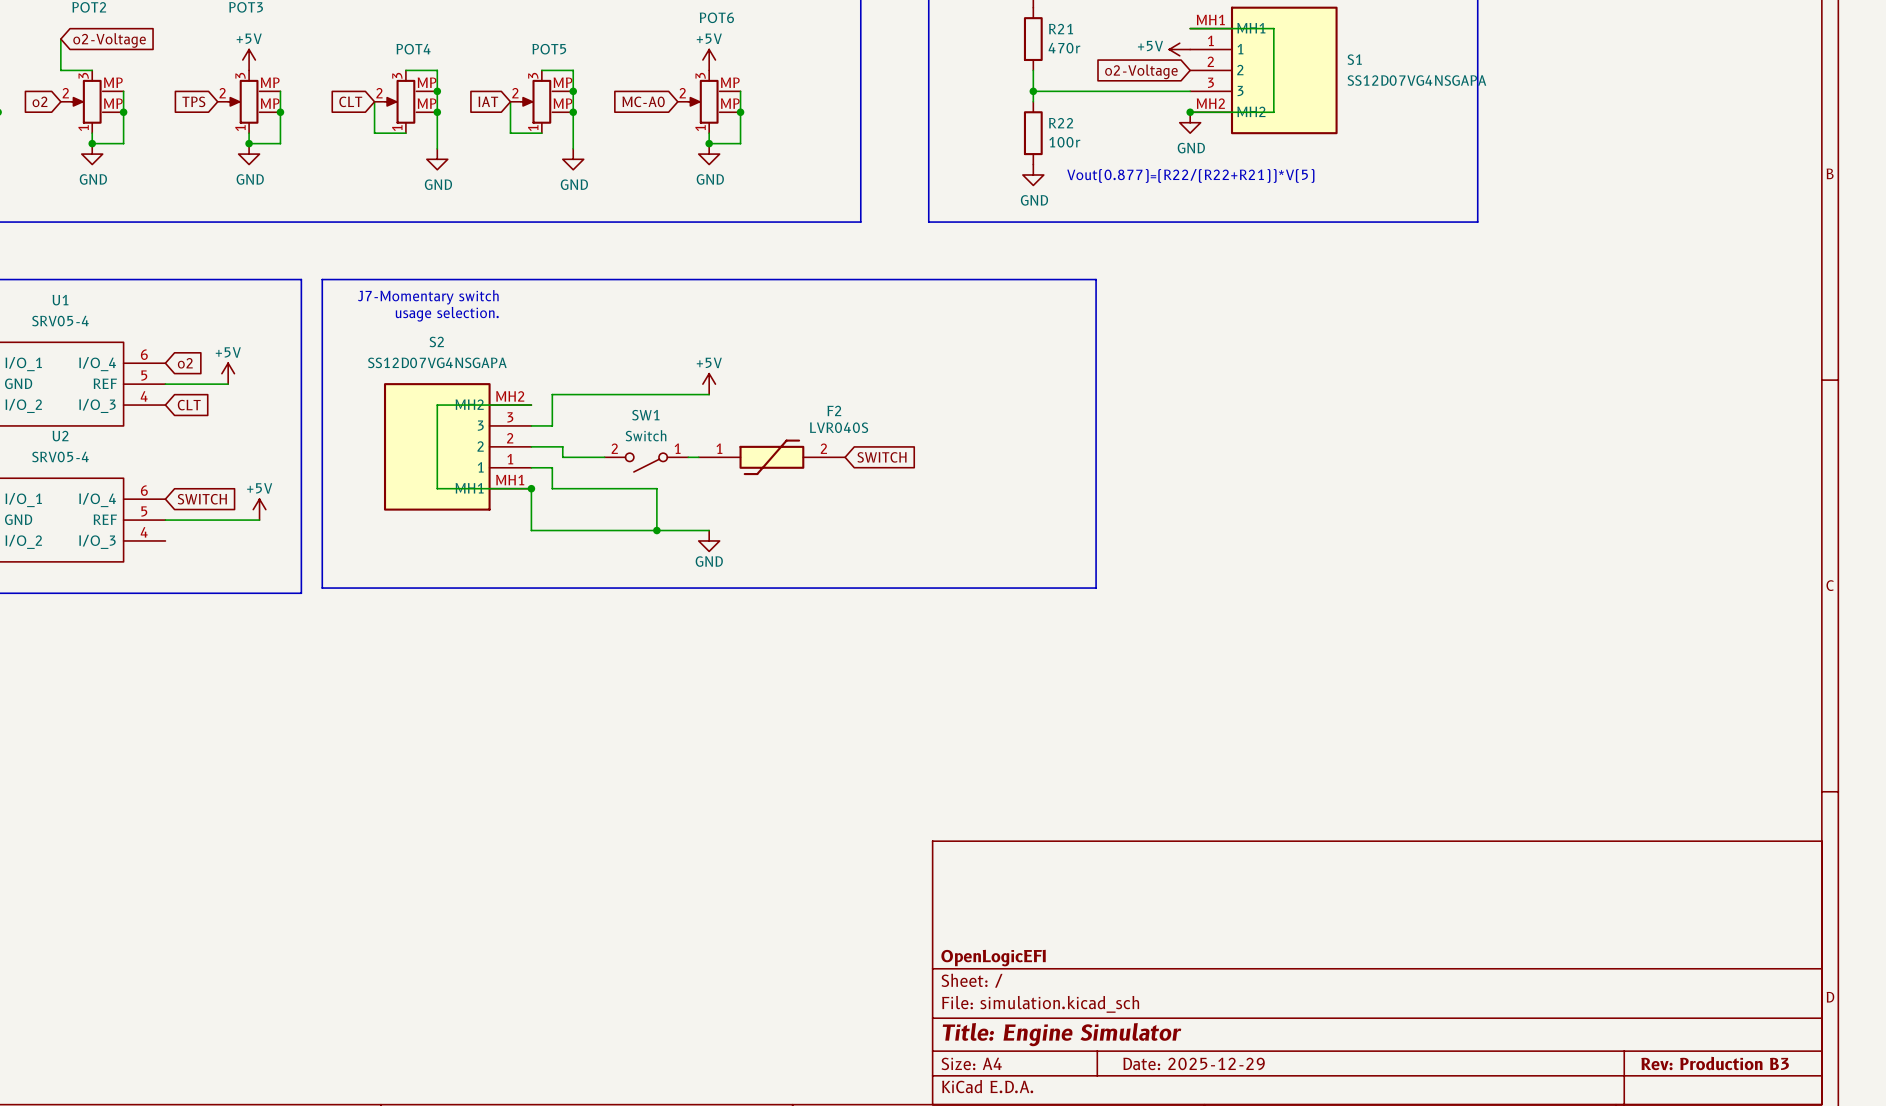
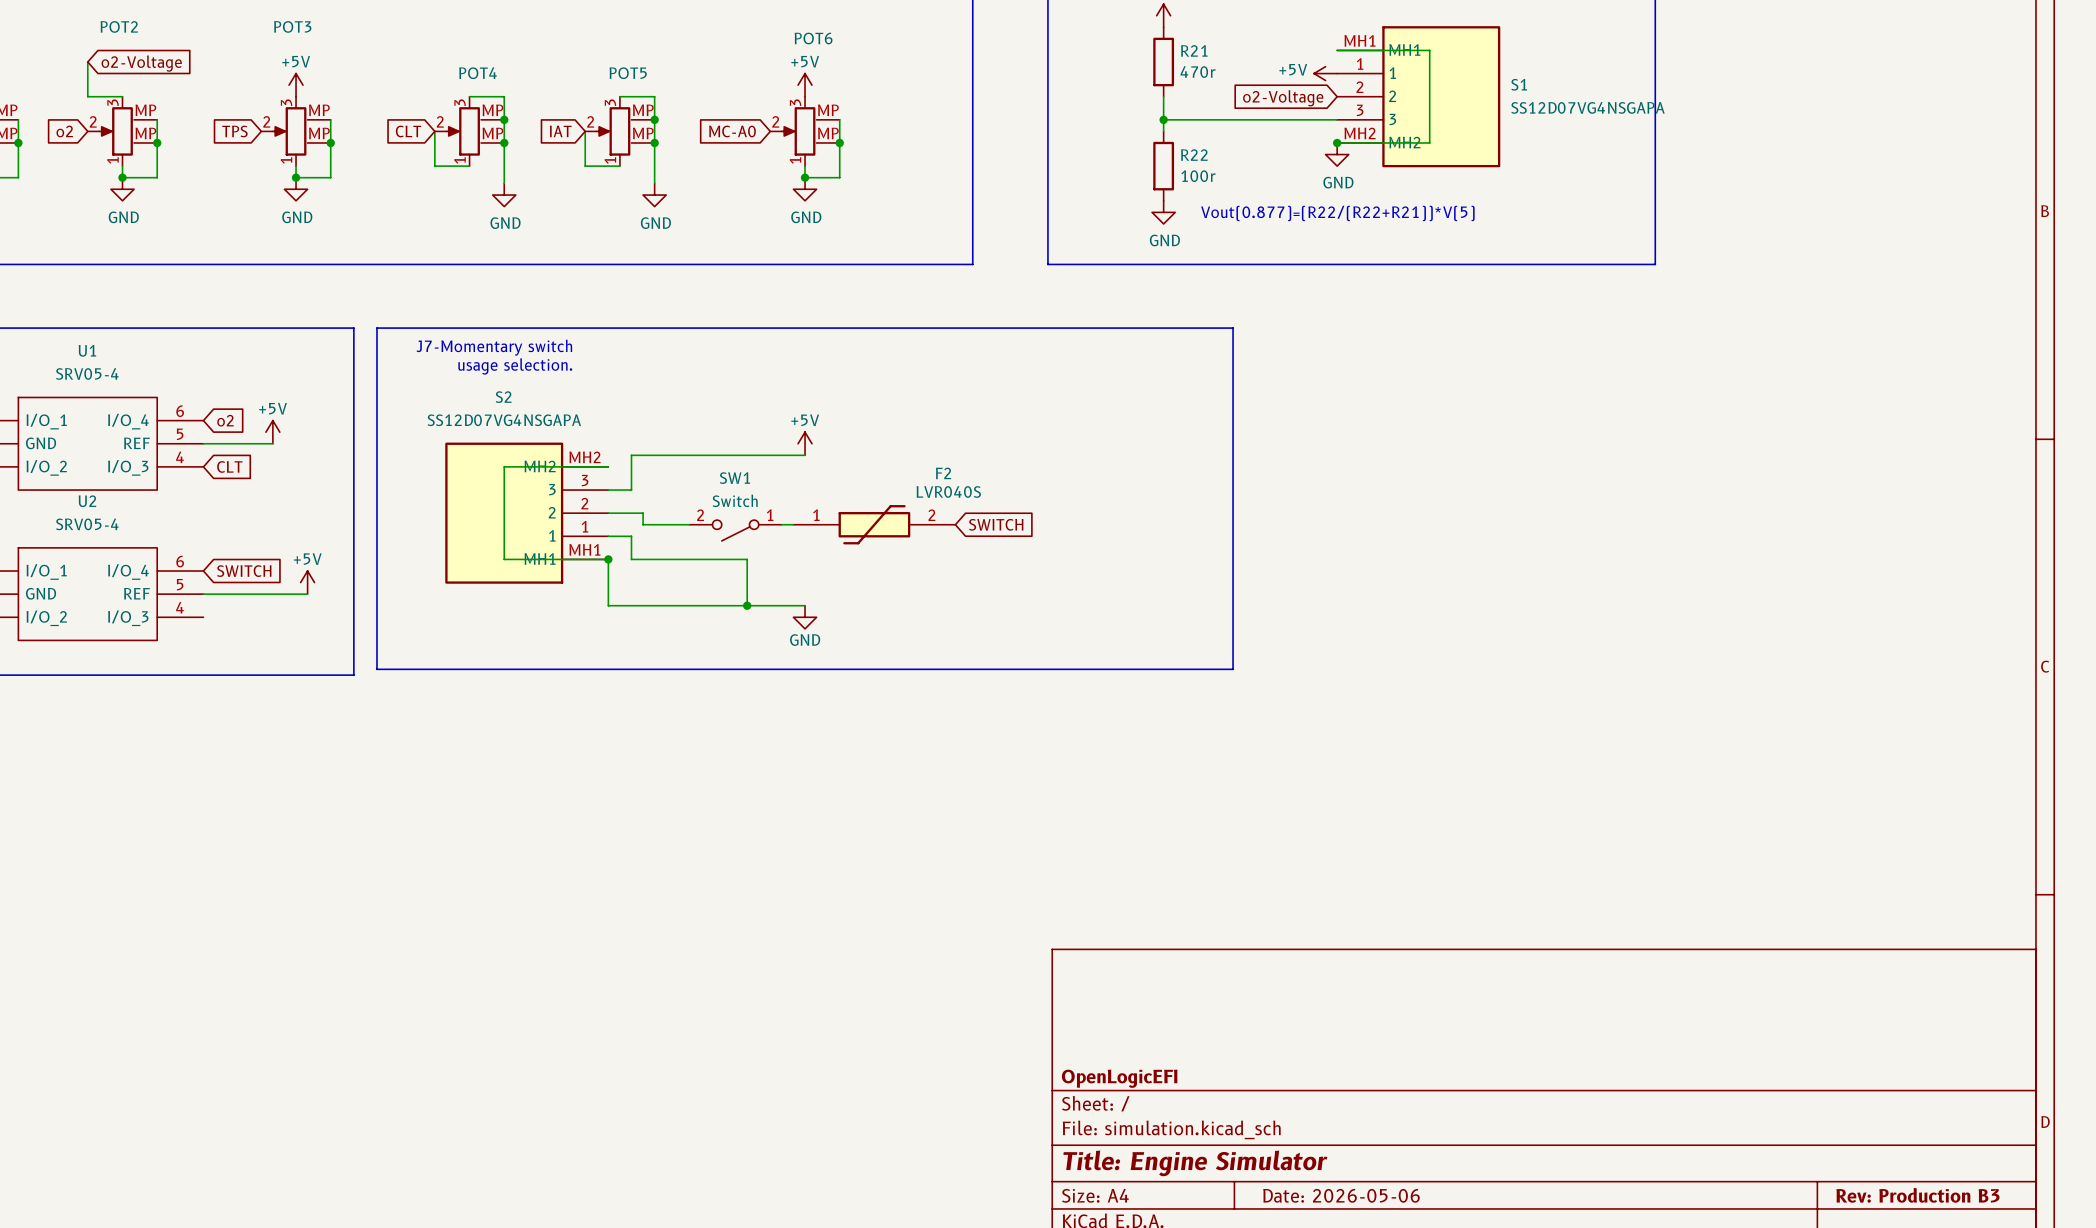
title block: Date: 2025-12-29 (1194, 1063) -> Date: 2026-05-06 (1341, 1195)

